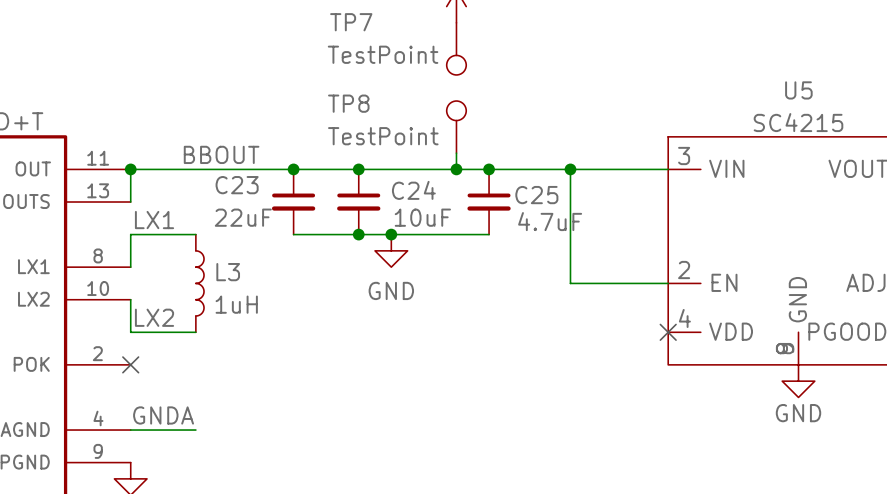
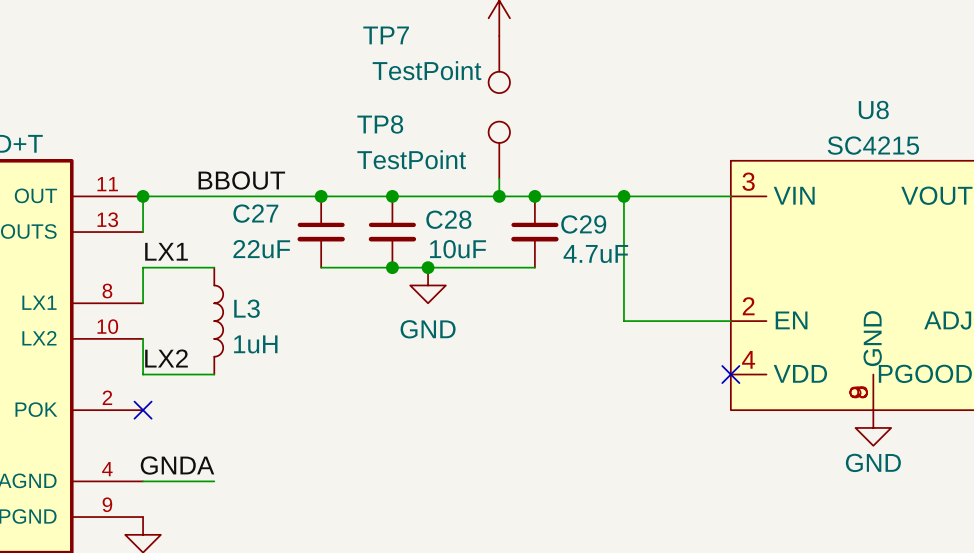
U5 name: U5 (798, 90) -> U8 (873, 110)
C23 name: C23 (237, 185) -> C27 (255, 213)
C24 name: C24 (413, 190) -> C28 (448, 219)
C25 name: C25 (536, 195) -> C29 (583, 224)

